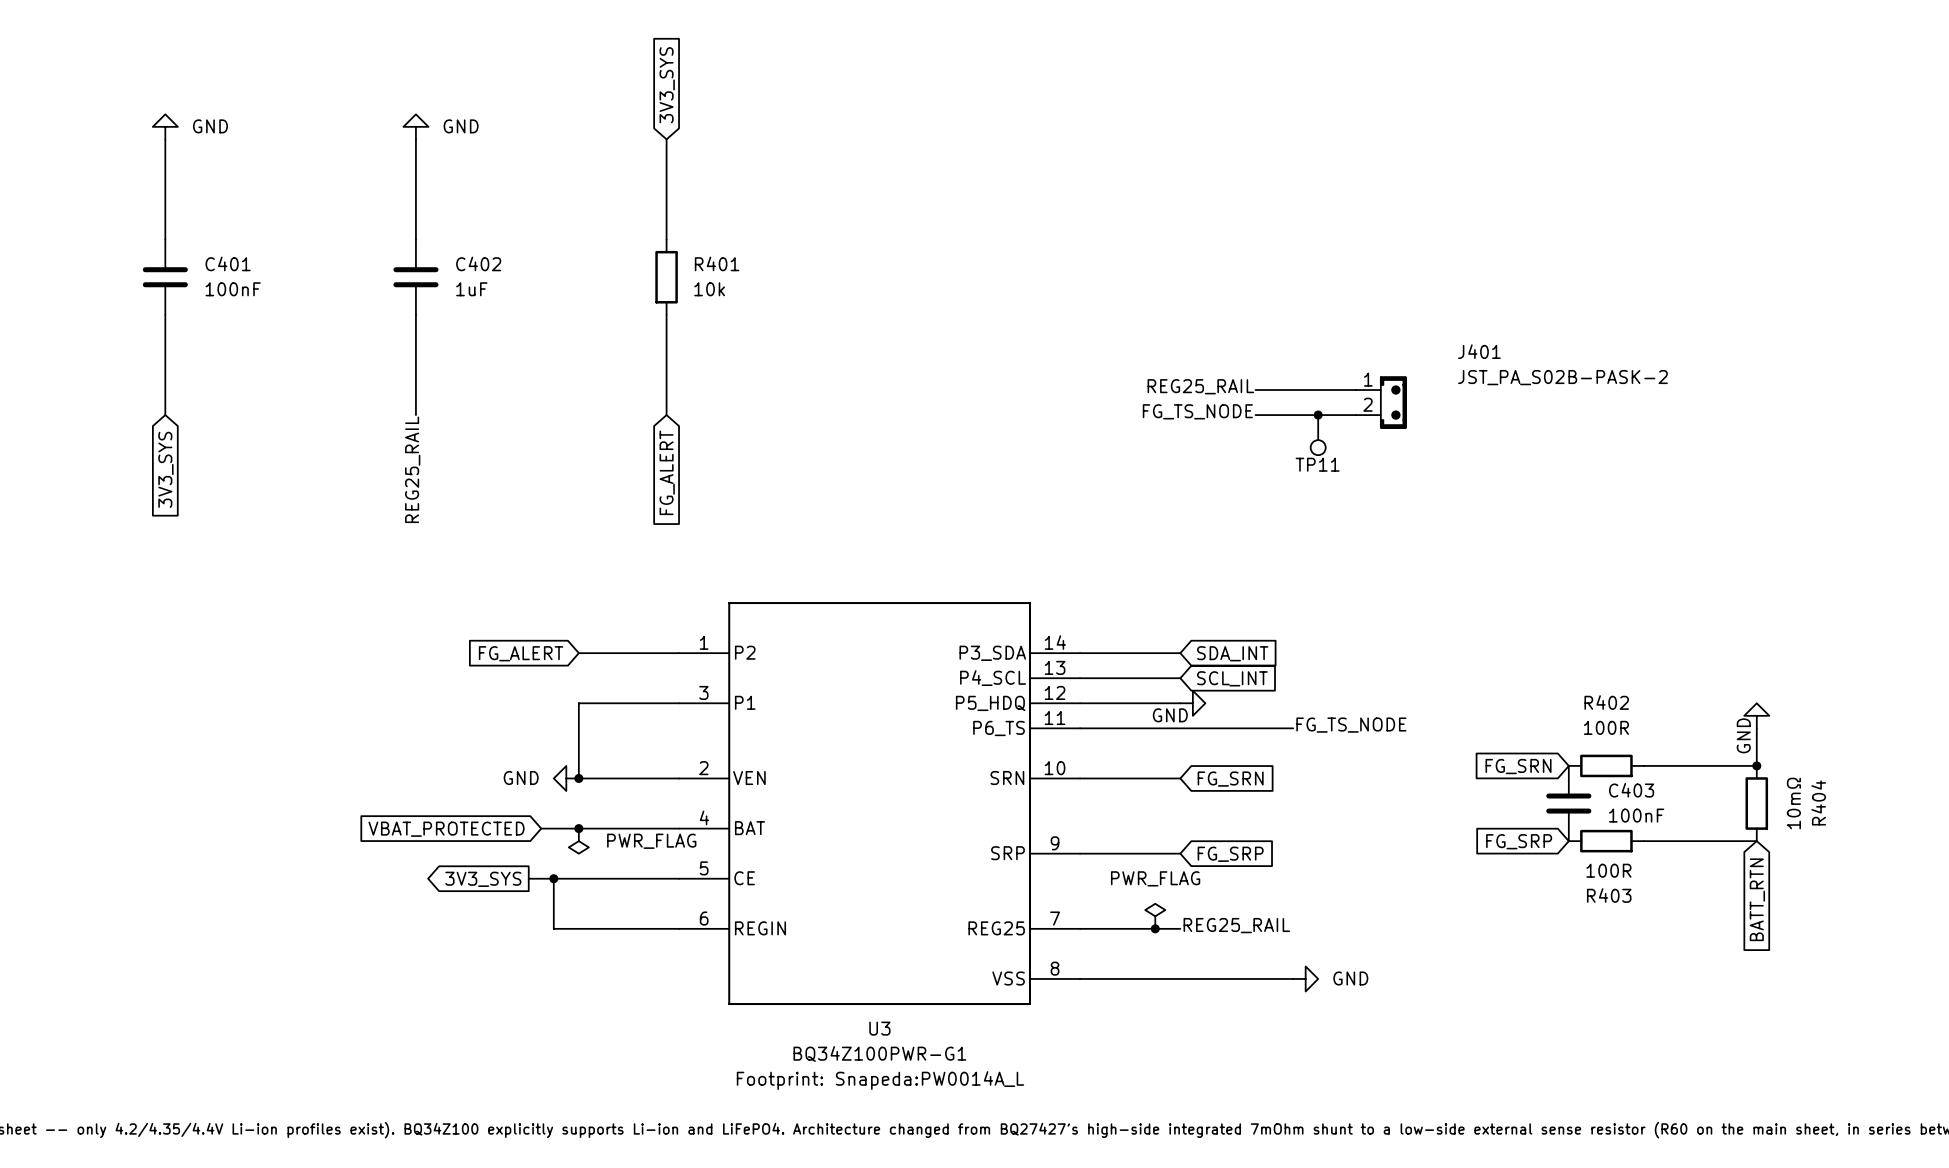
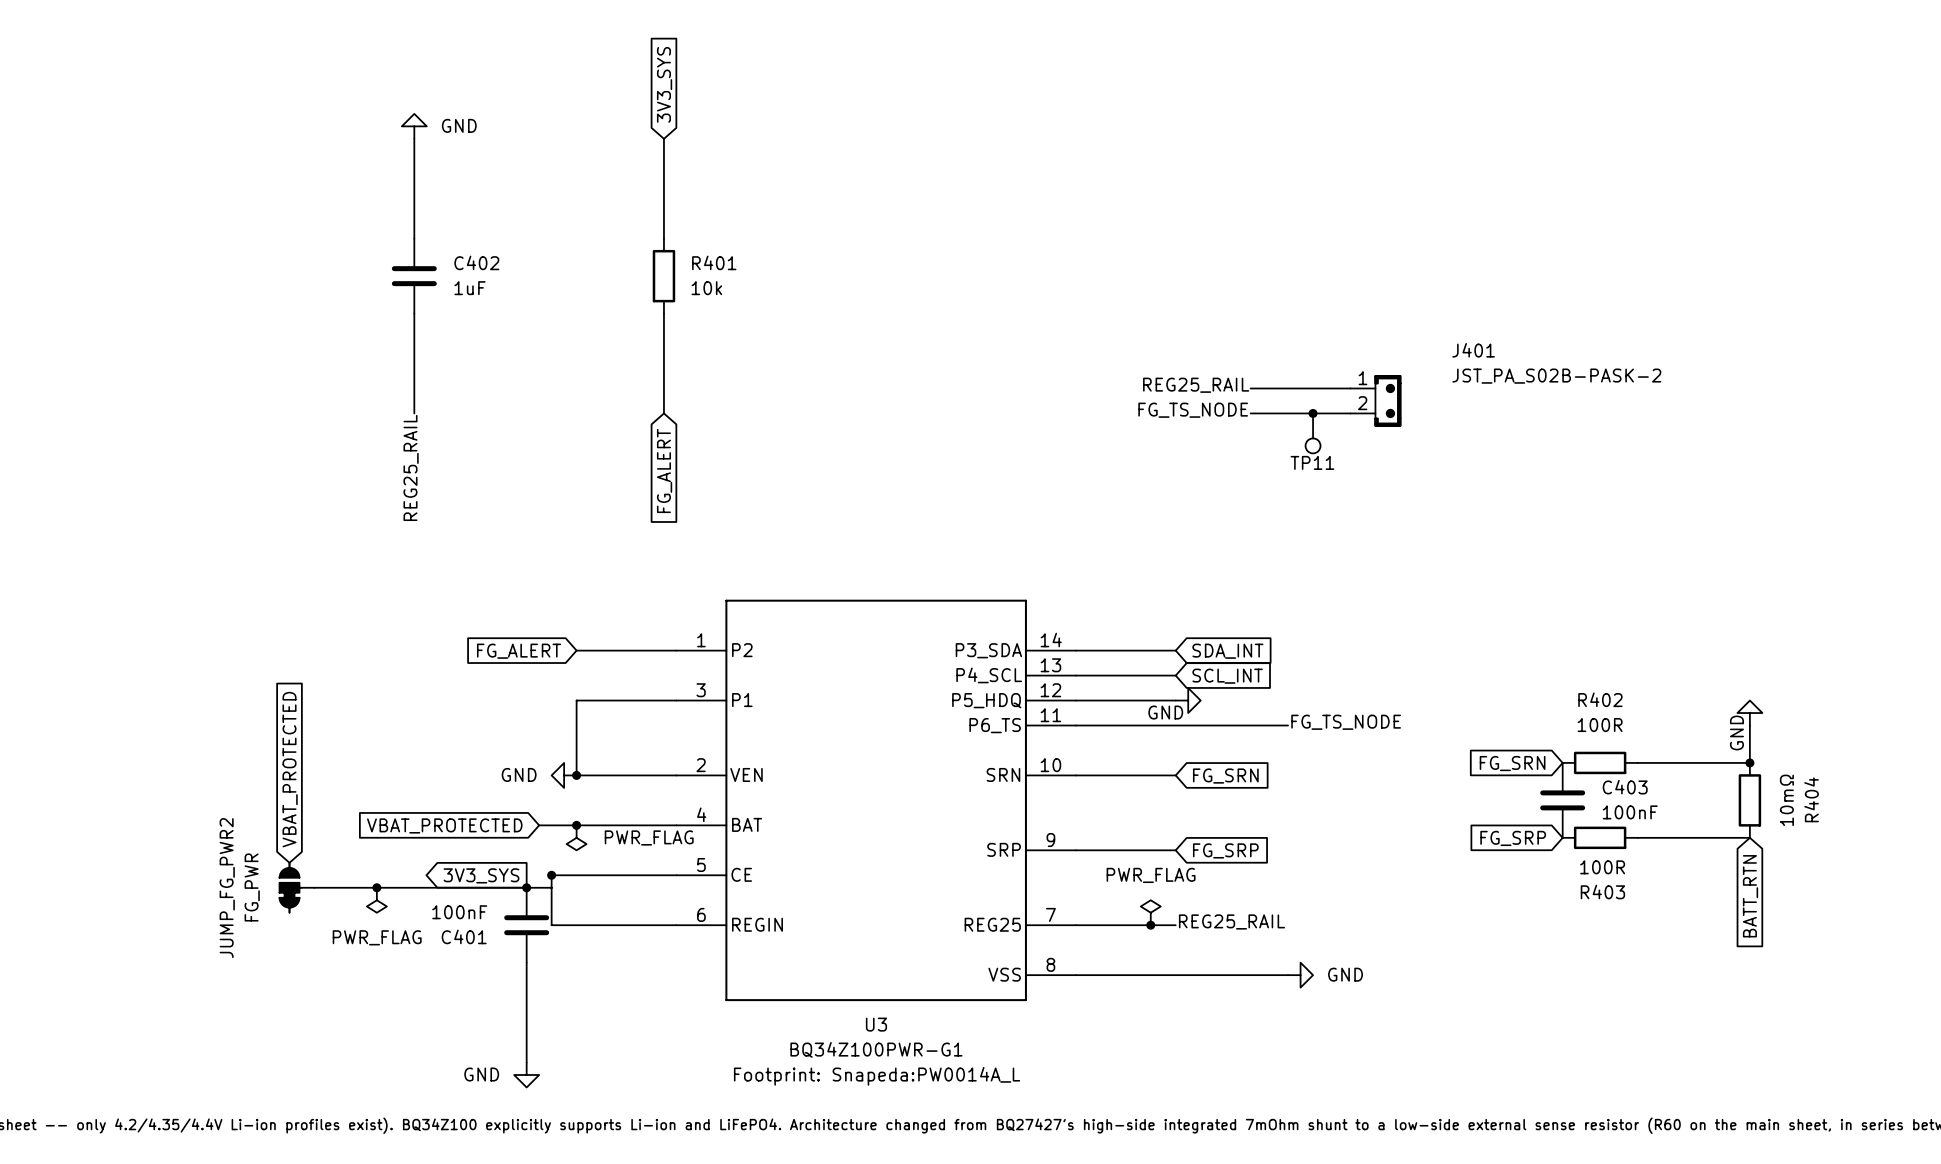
power symbol: GND (165, 126) -> none
wire: (165, 139) (165, 239) -> none
C401 name position: C401 (228, 263) -> C401 (464, 936)
C401 position: (165, 277) -> (526, 925)
C401 value position: 100nF (233, 289) -> 100nF (459, 912)
wire: (165, 314) (165, 415) -> none
global label: 3V3_SYS (165, 469) -> none
global label: none -> VBAT_PROTECTED (290, 769)
wire: (528, 878) (553, 878) -> none
JUMP_FG_PWR2: none -> FG_PWR (296, 887)
wire: none -> (314, 887) (551, 887)
junction: none -> (376, 887)
junction: none -> (526, 887)
power symbol: none -> PWR_FLAG (376, 900)
wire: none -> (526, 962) (526, 1062)
power symbol: none -> GND (526, 1075)

